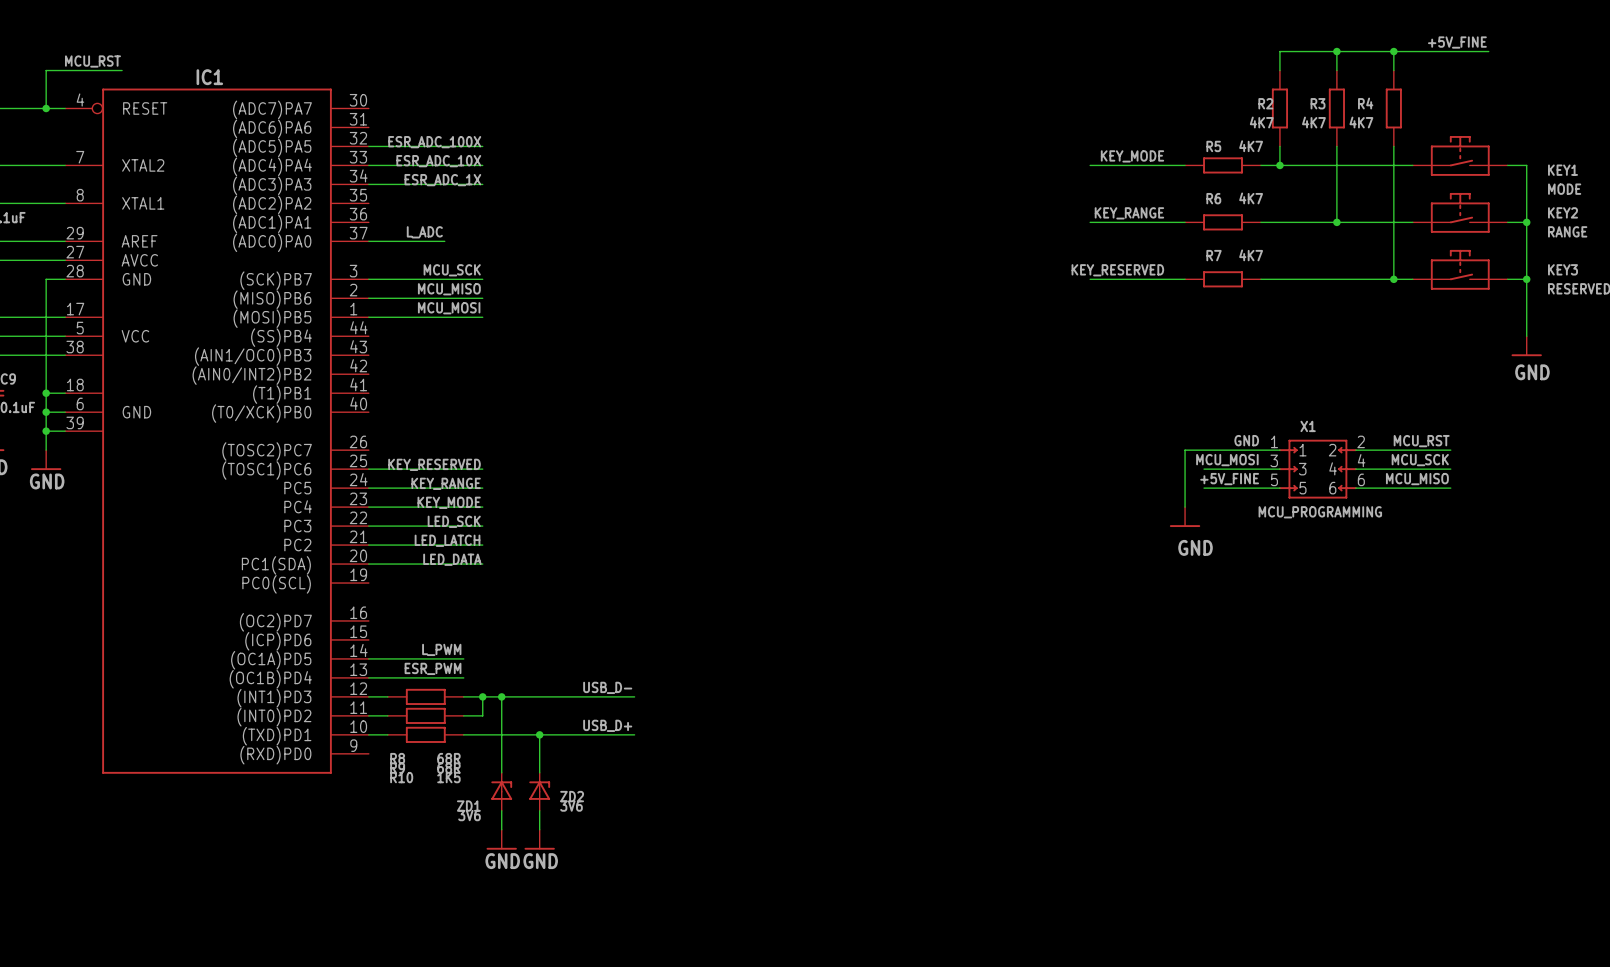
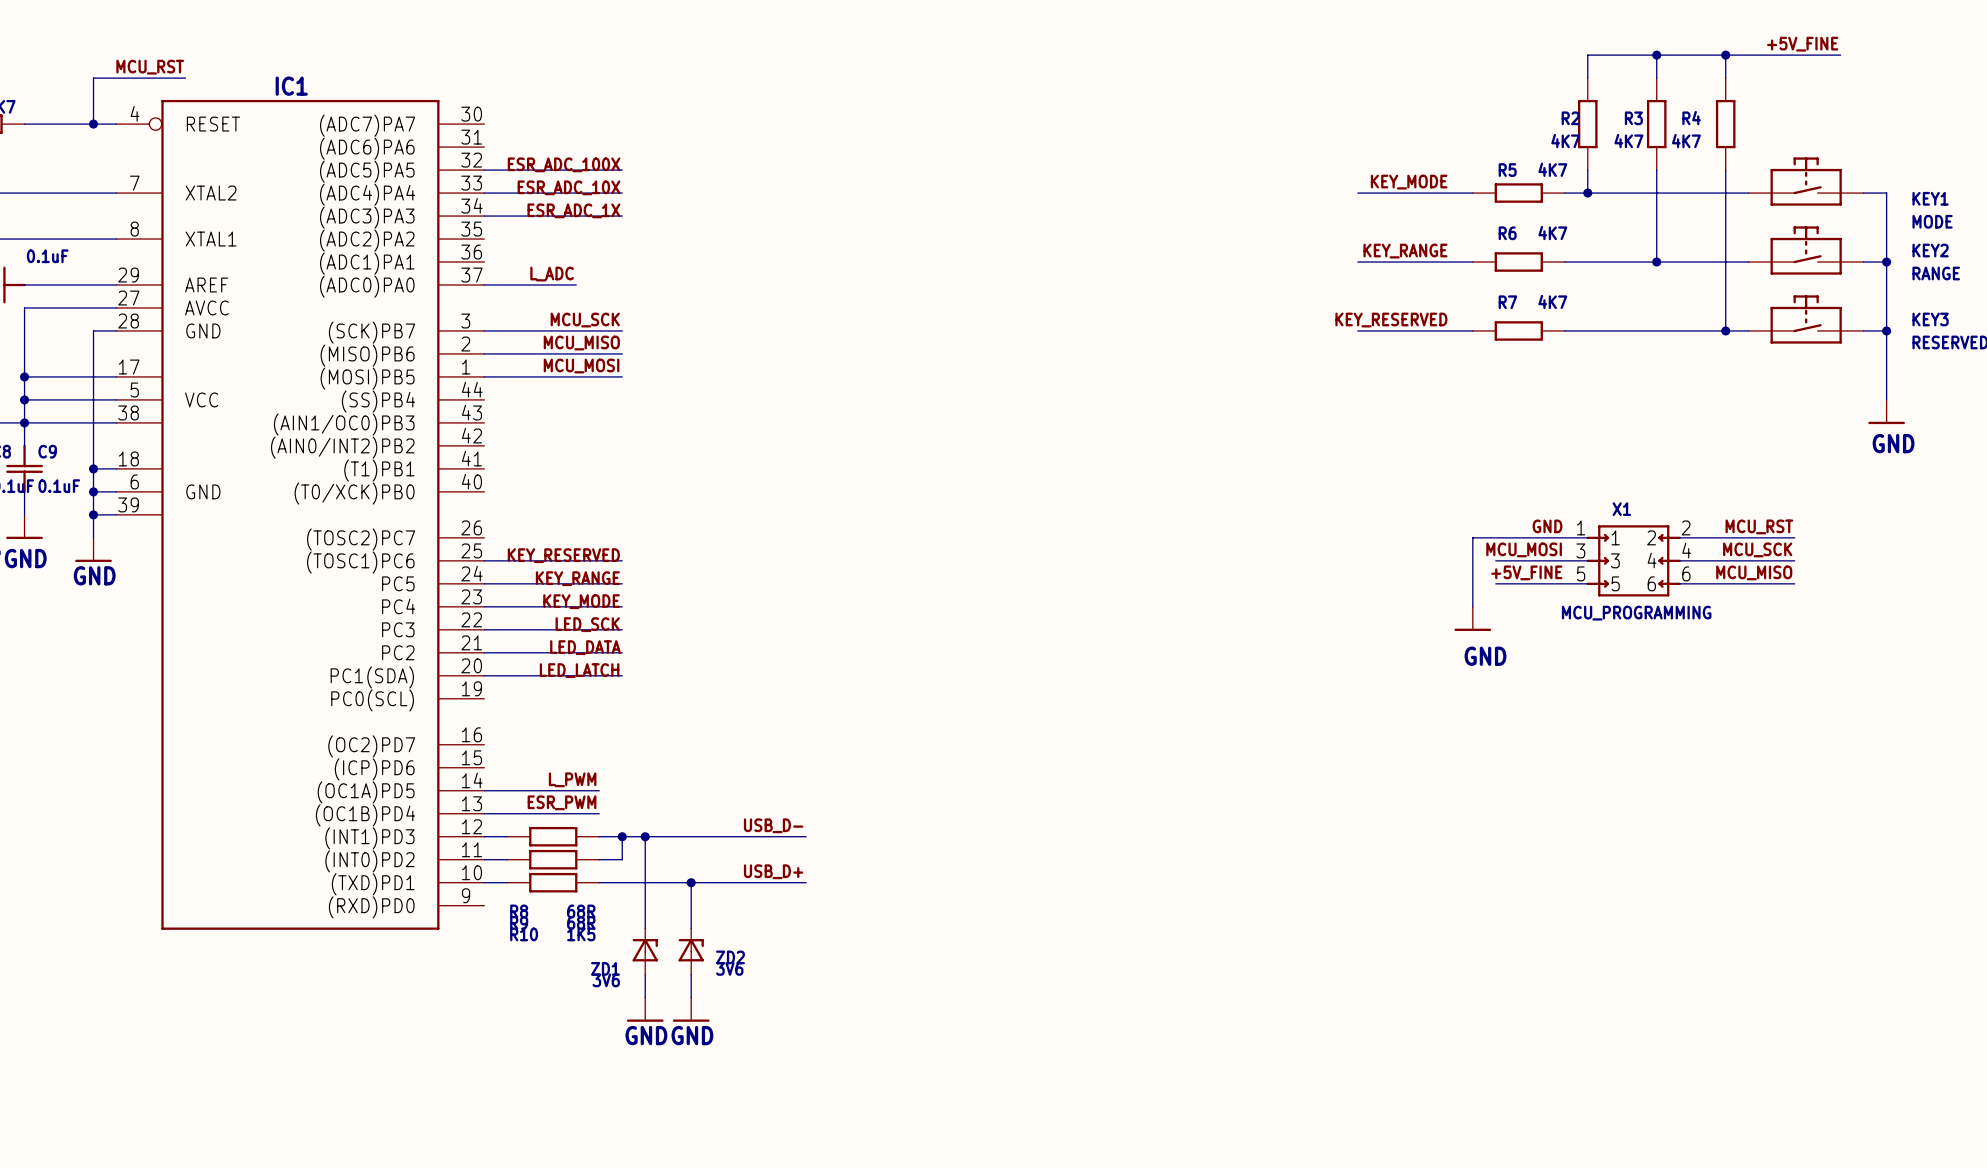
label: LED_LATCH (447, 540) -> LED_DATA (585, 647)
label: LED_DATA (452, 559) -> LED_LATCH (579, 670)

